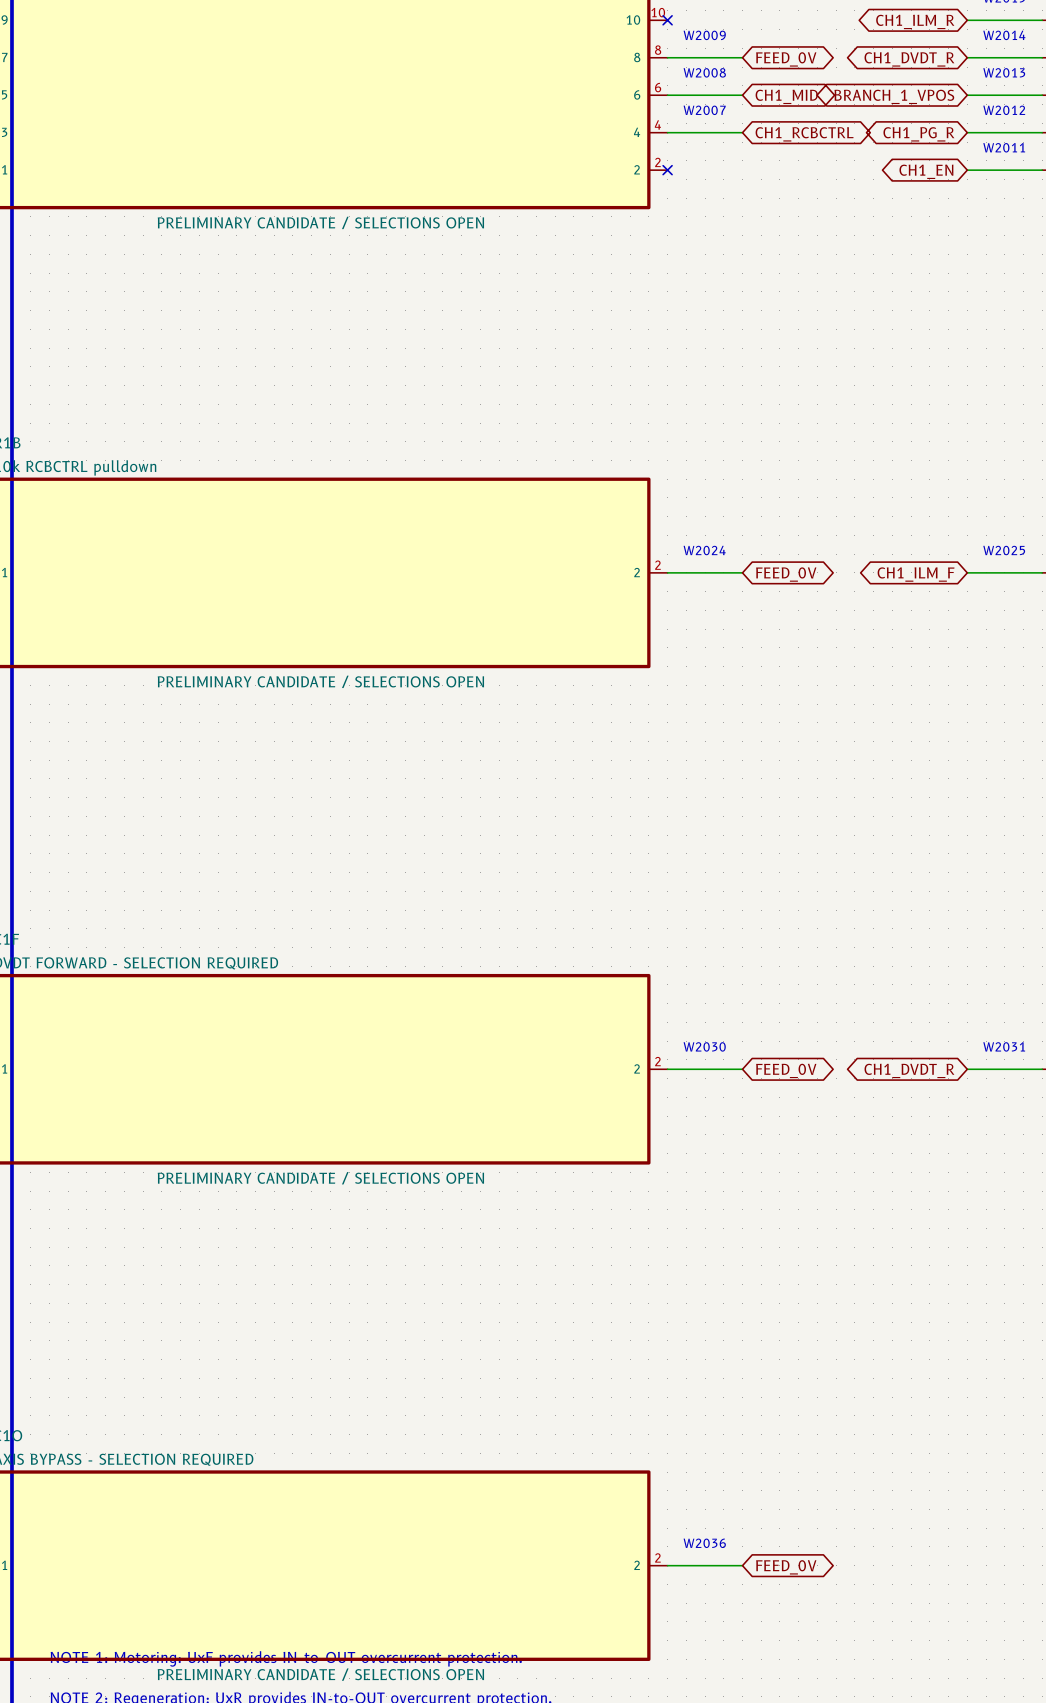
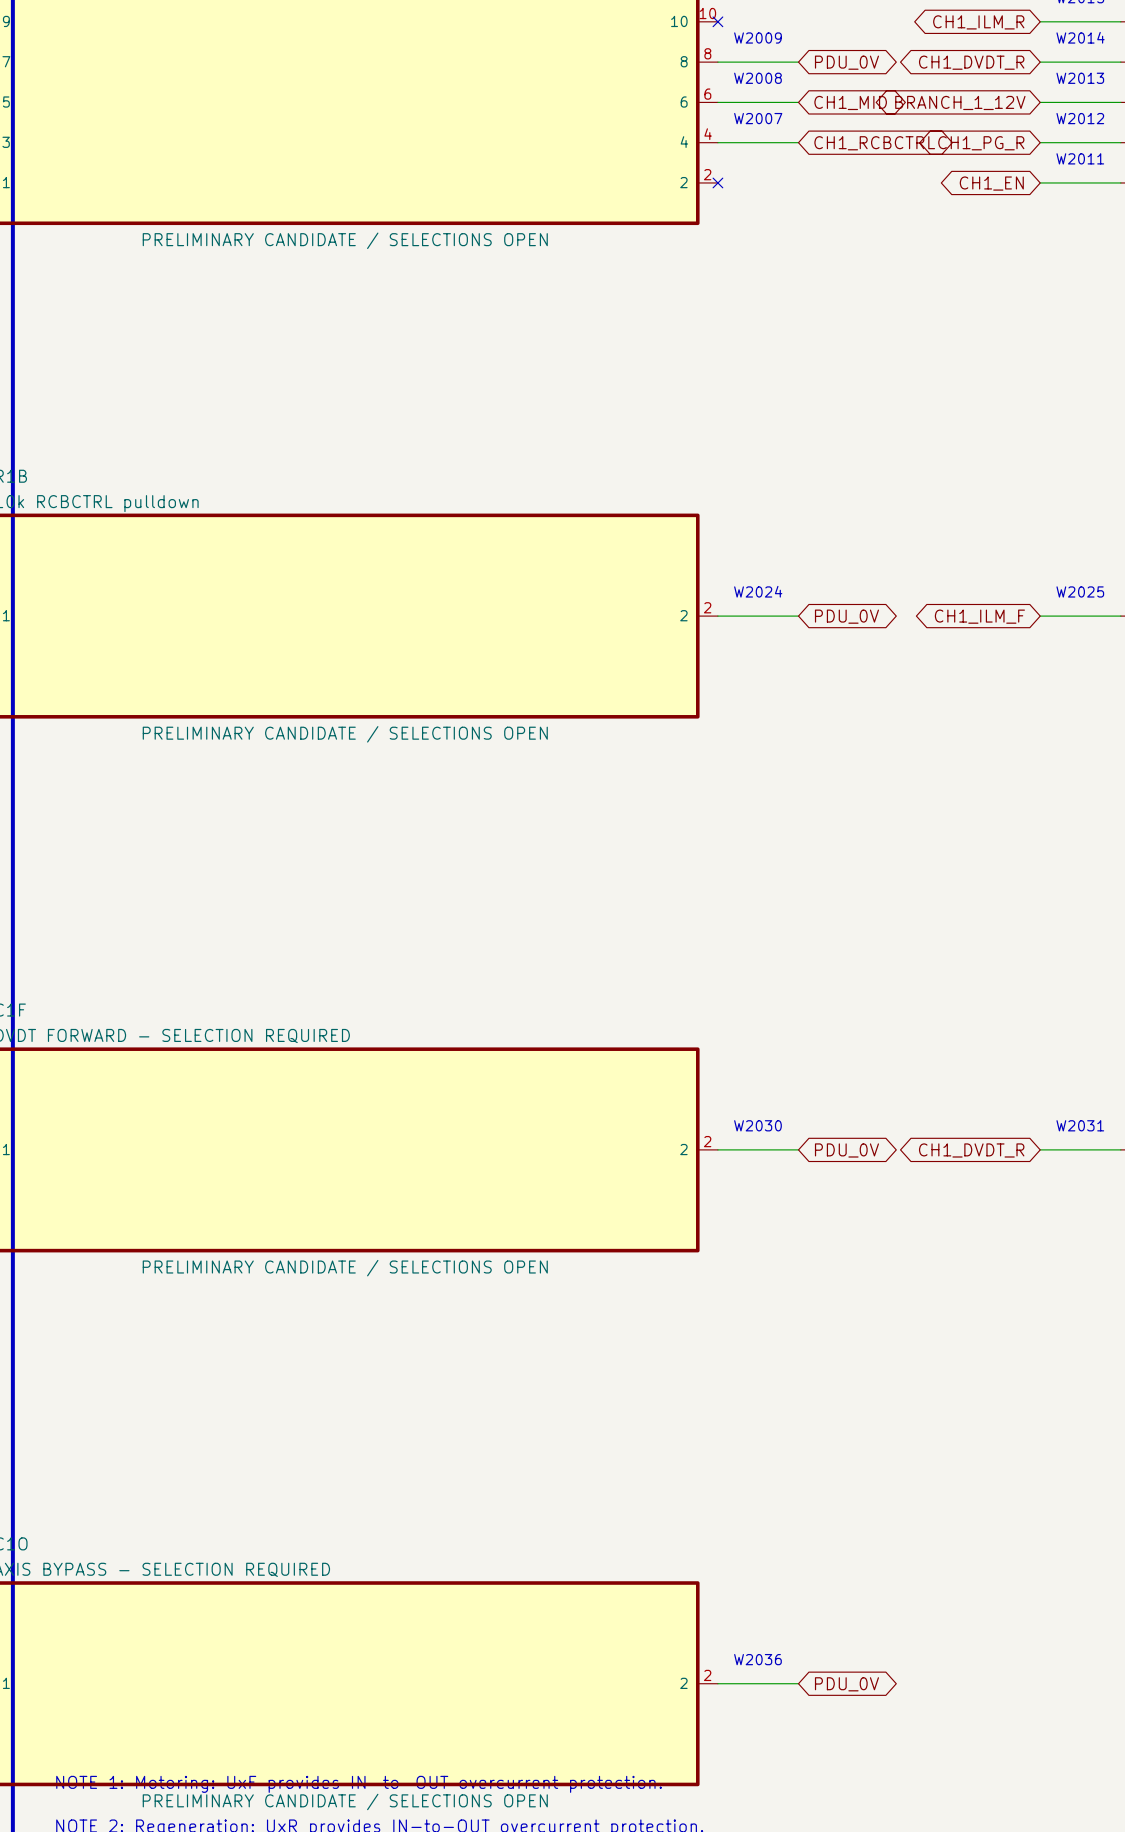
global label: FEED_0V (786, 59) -> PDU_0V (846, 62)
global label: BRANCH_1_VPOS (894, 96) -> BRANCH_1_12V (960, 102)
global label: FEED_0V (786, 574) -> PDU_0V (846, 616)
global label: FEED_0V (786, 1070) -> PDU_0V (846, 1150)
global label: FEED_0V (786, 1567) -> PDU_0V (846, 1684)

